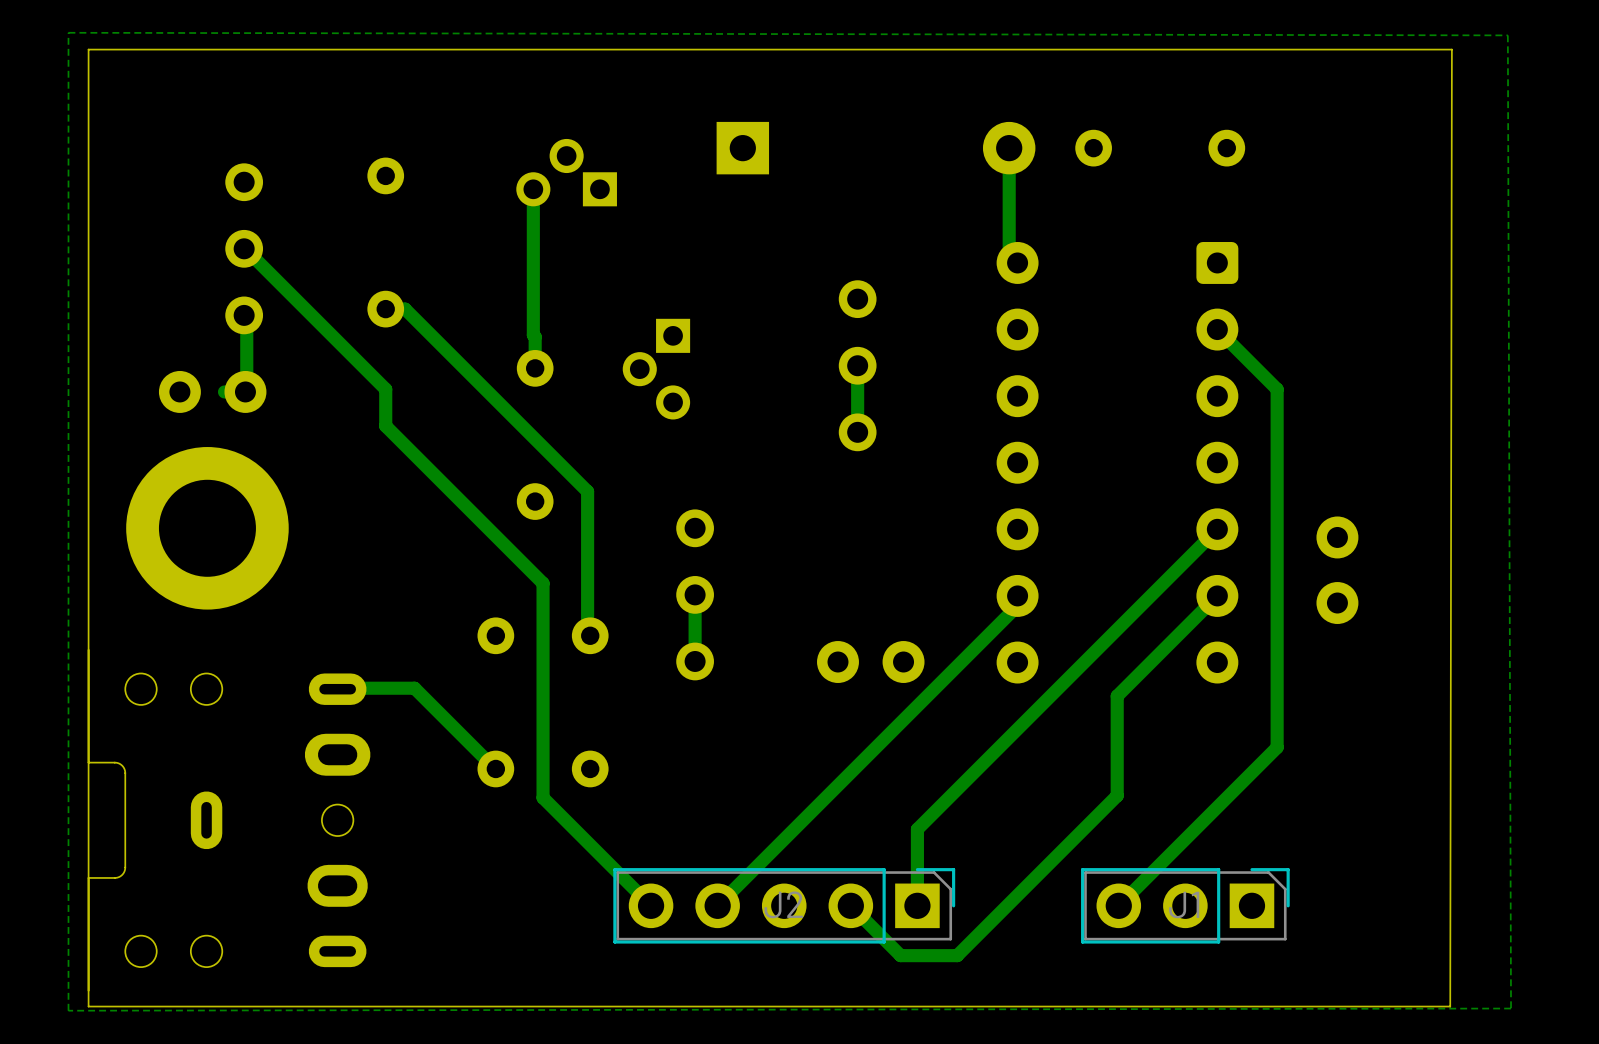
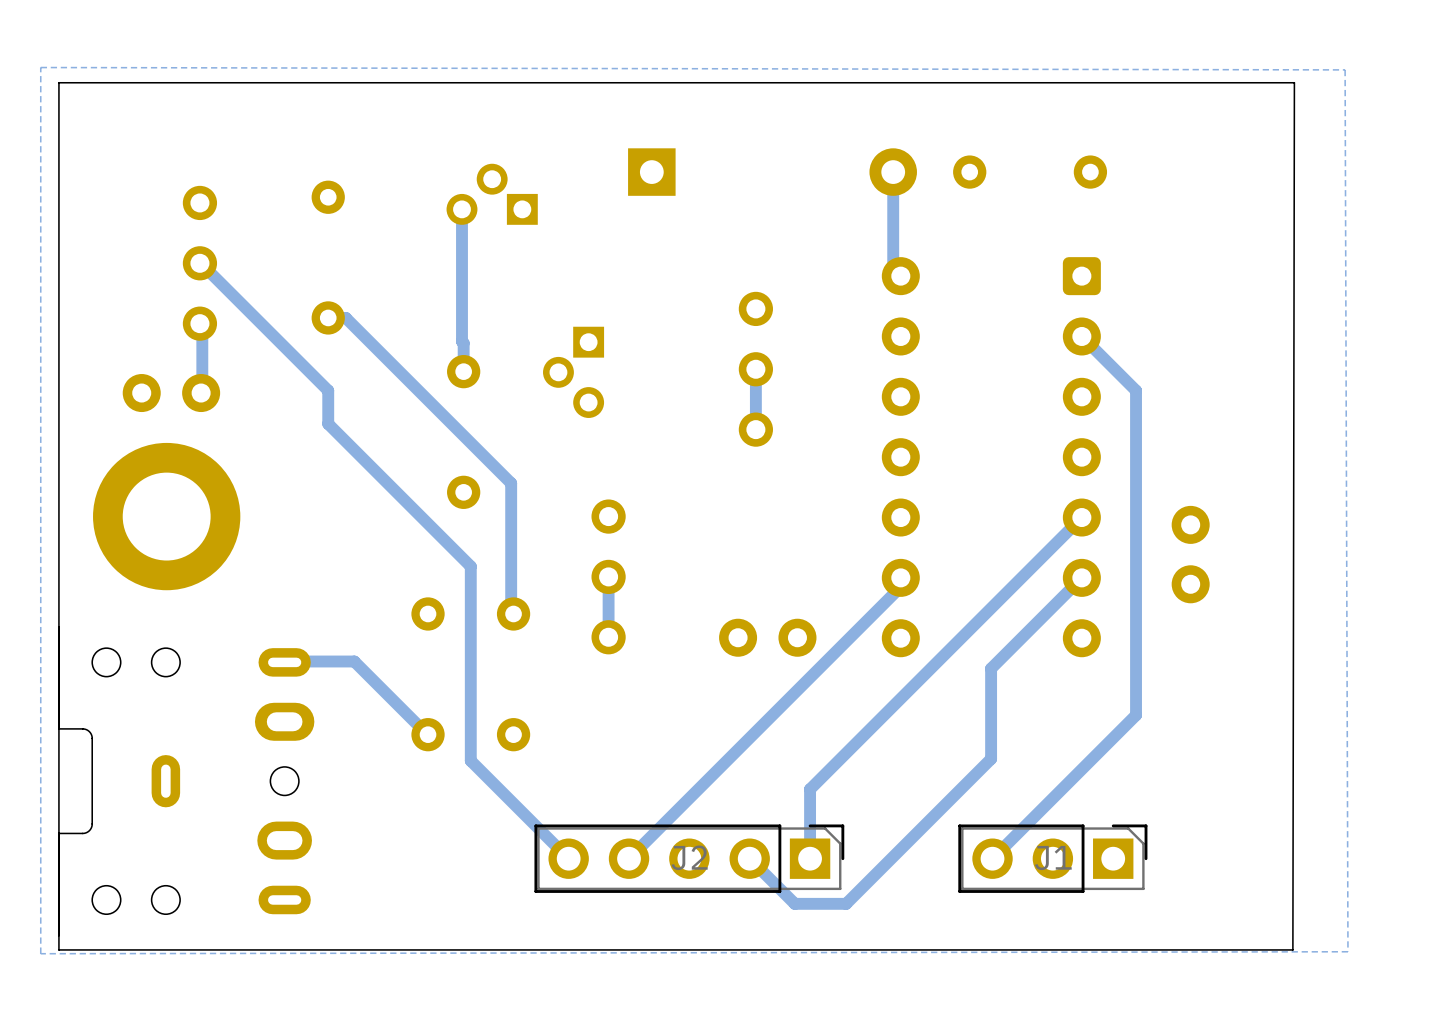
track: (225, 391) (224, 391) -> none

